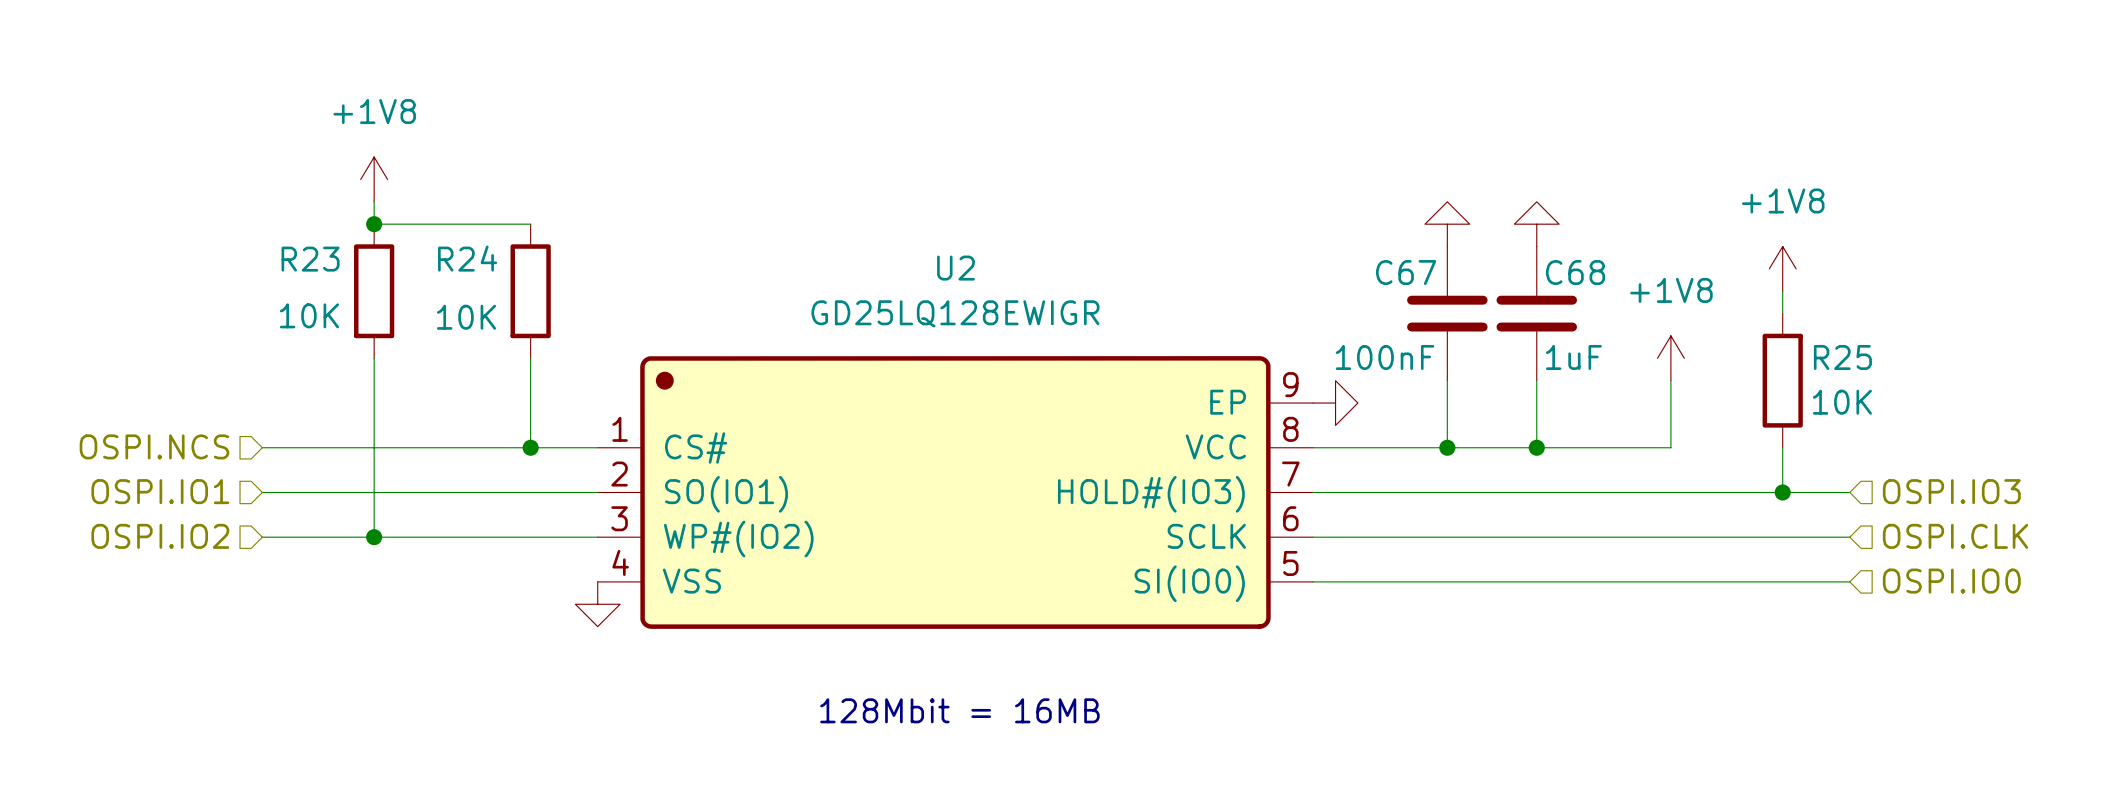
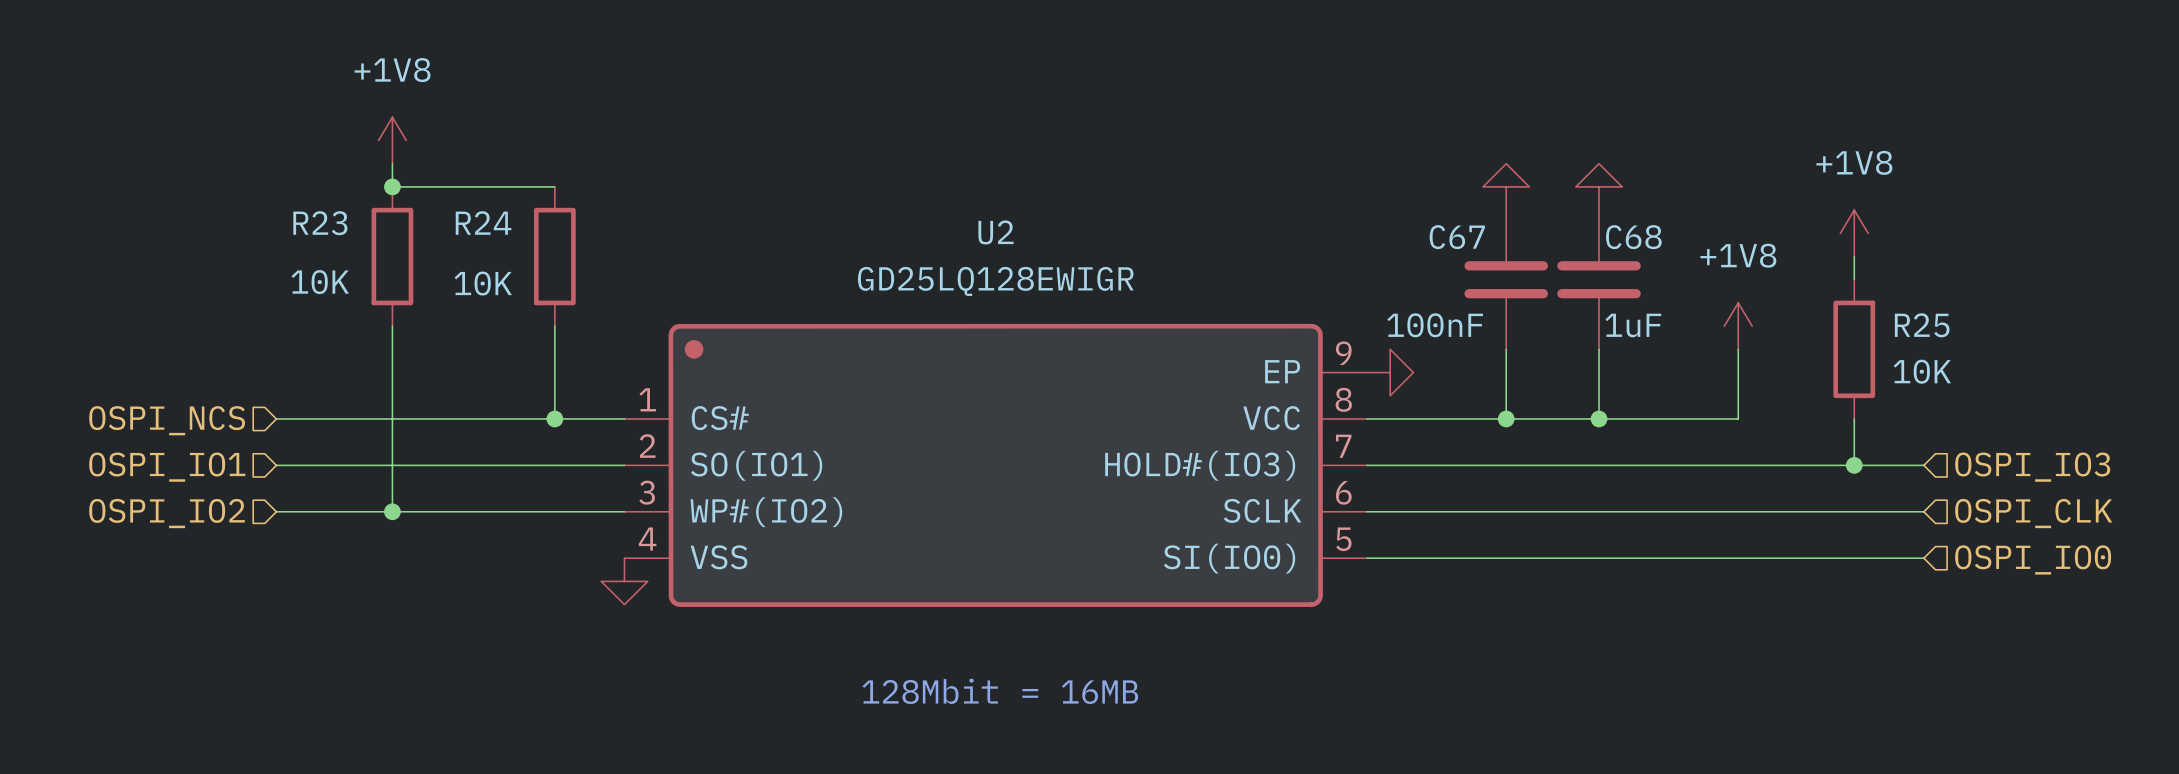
hierarchical label: OSPI.NCS (154, 446) -> OSPI_NCS (167, 420)
hierarchical label: OSPI.IO1 (160, 491) -> OSPI_IO1 (167, 467)
hierarchical label: OSPI.IO3 (1951, 491) -> OSPI_IO3 (2032, 467)
hierarchical label: OSPI.IO2 (160, 536) -> OSPI_IO2 (167, 513)
hierarchical label: OSPI.CLK (1955, 536) -> OSPI_CLK (2033, 513)
hierarchical label: OSPI.IO0 (1951, 581) -> OSPI_IO0 (2033, 559)

